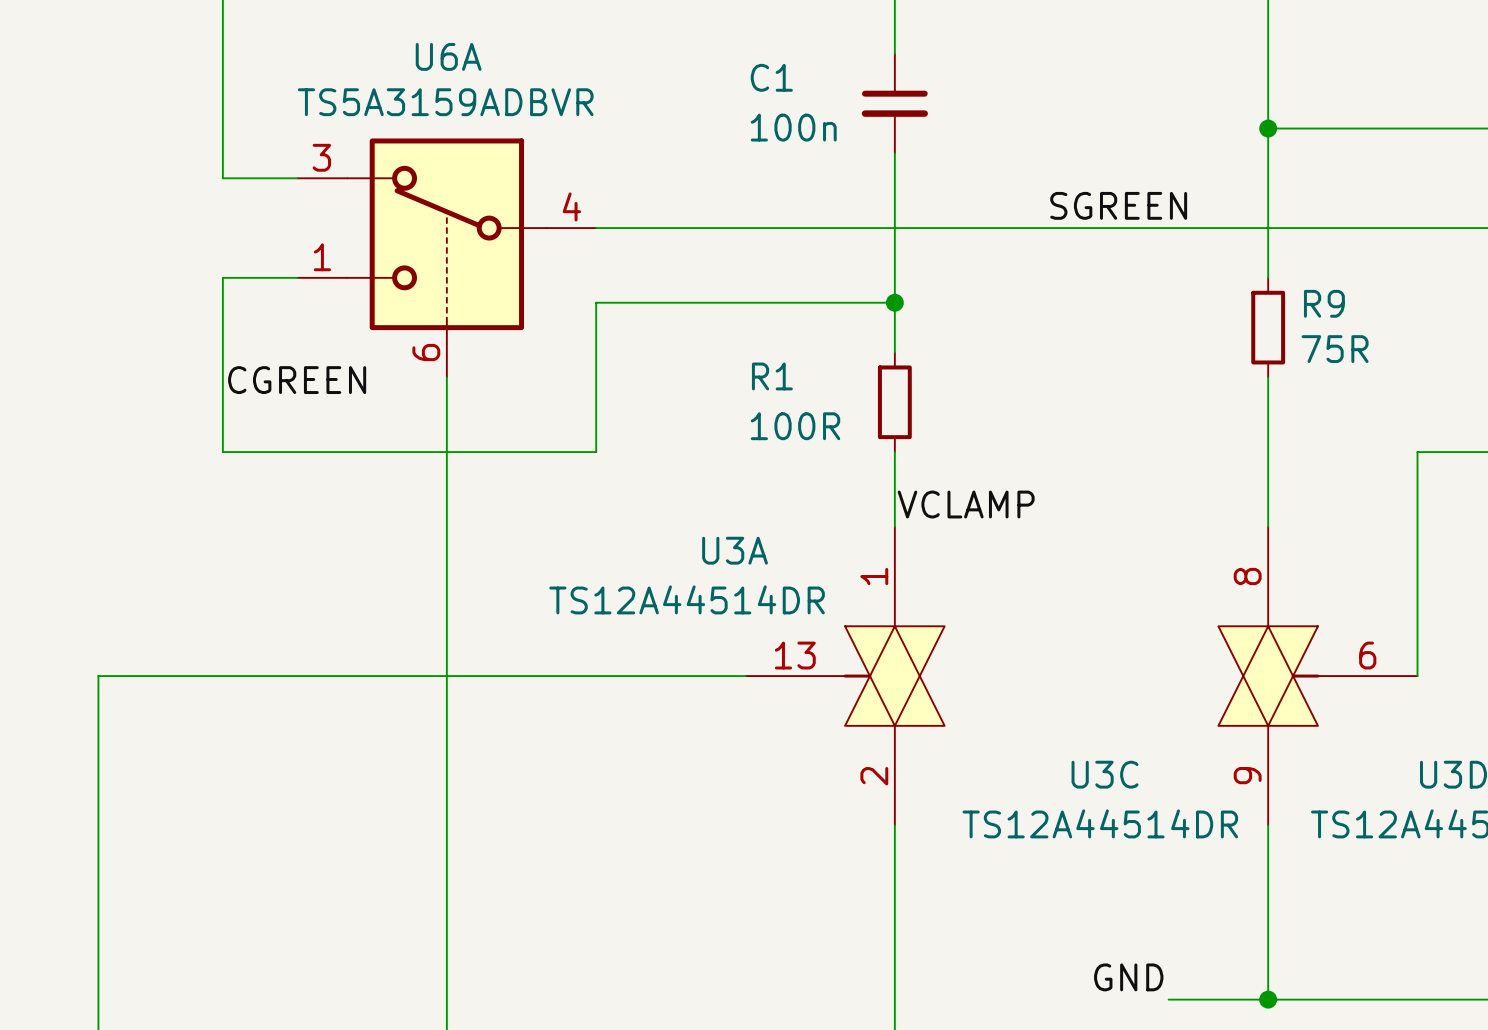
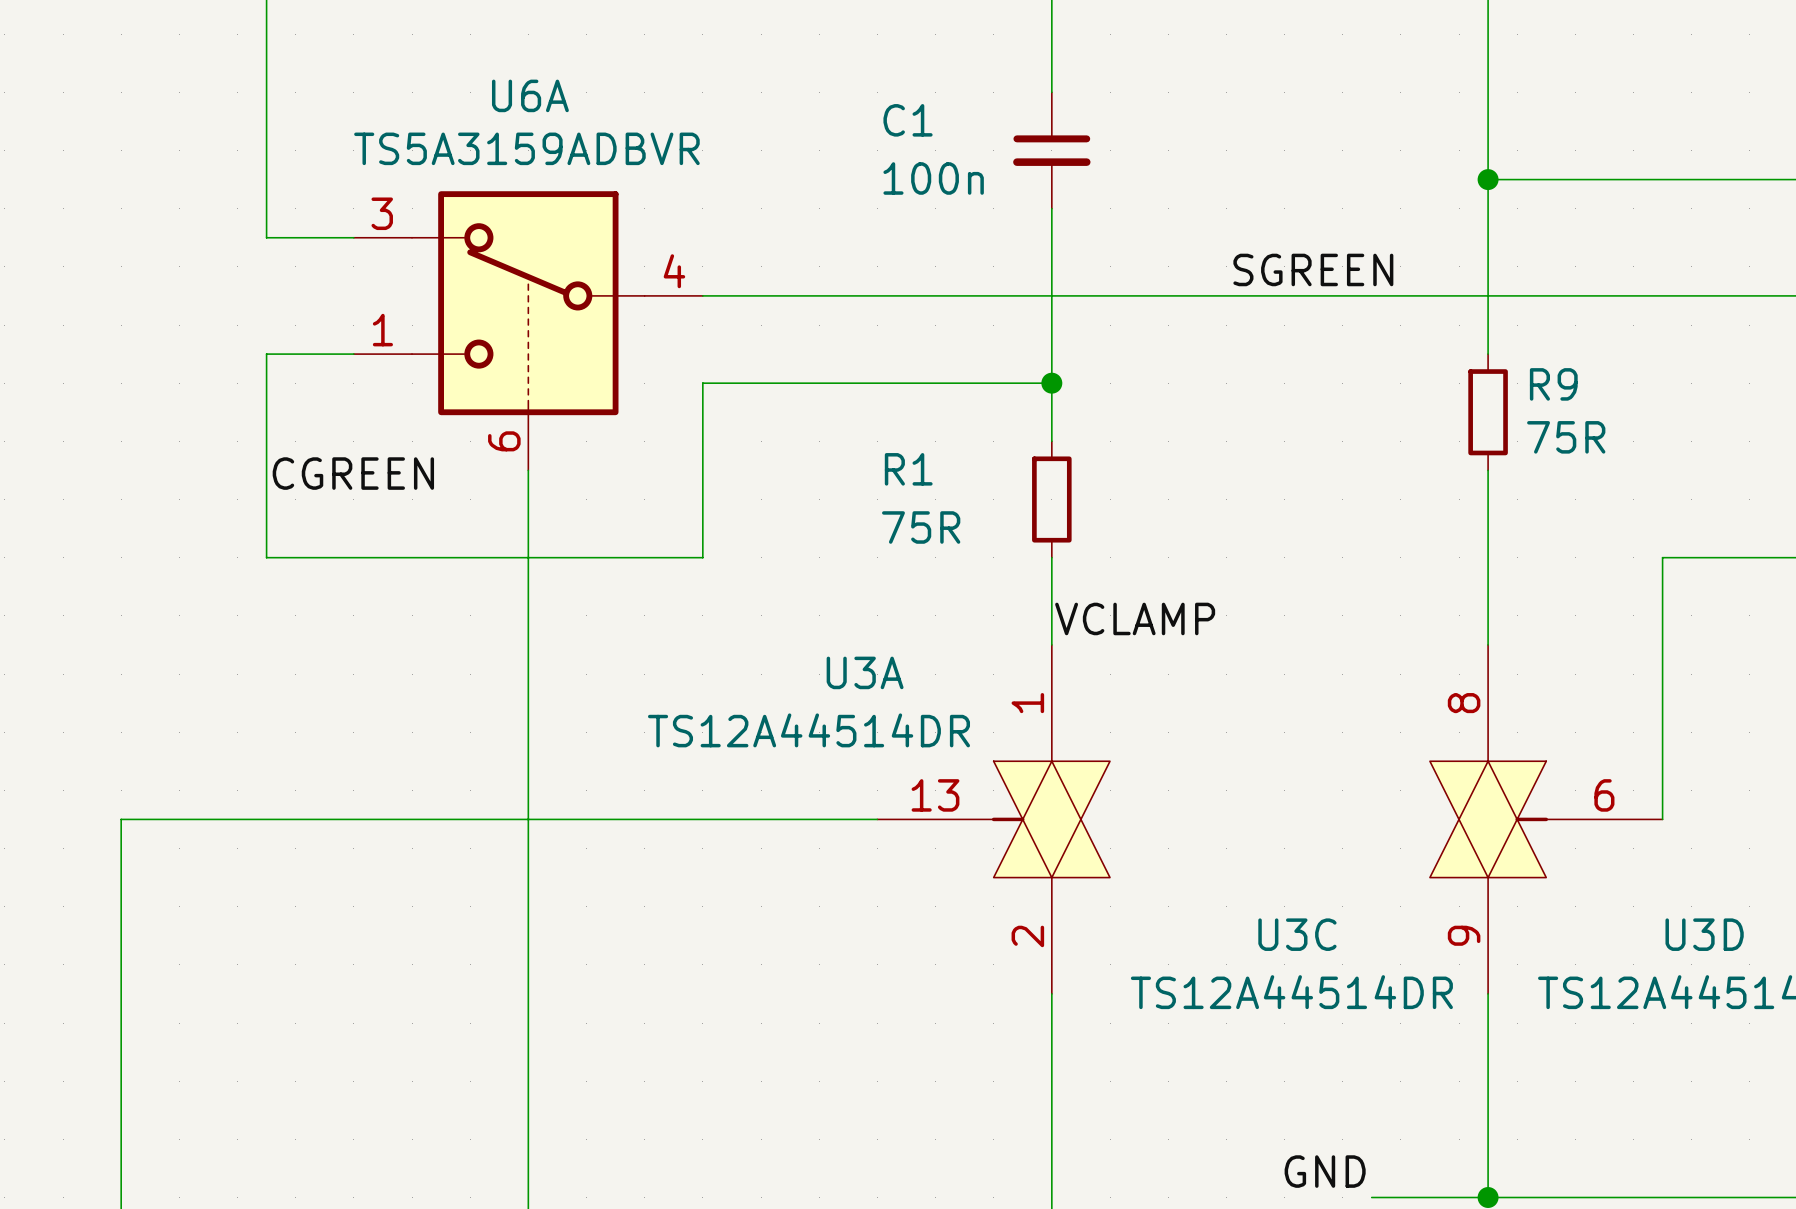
R1 value: 100R (795, 426) -> 75R (921, 527)

